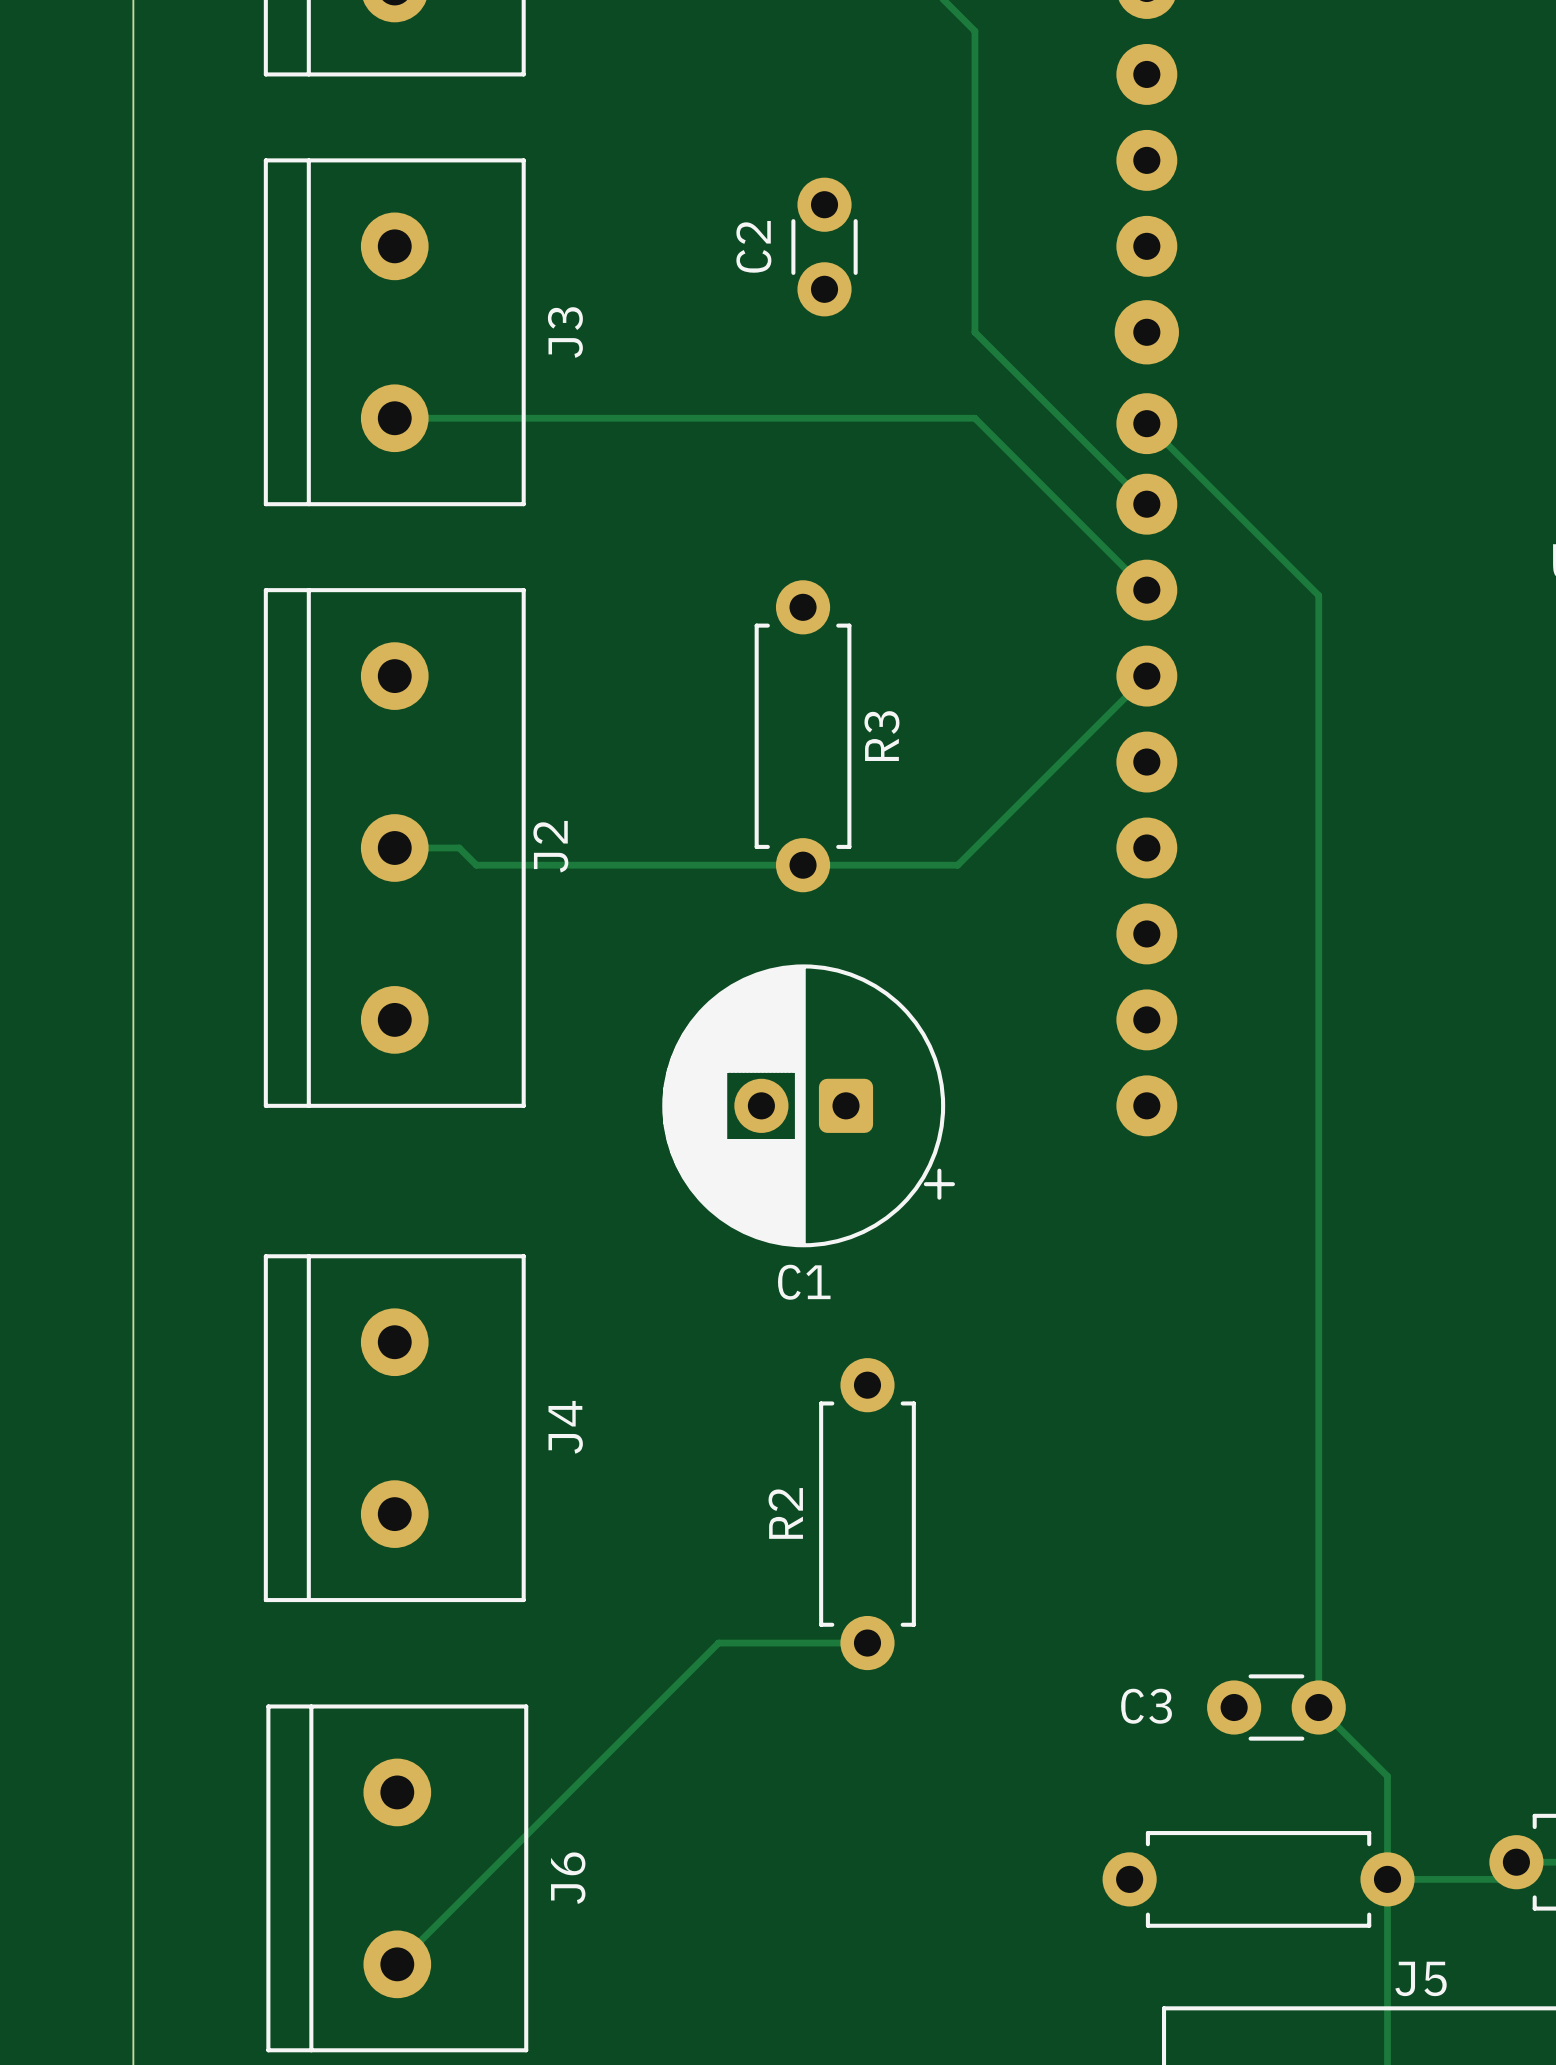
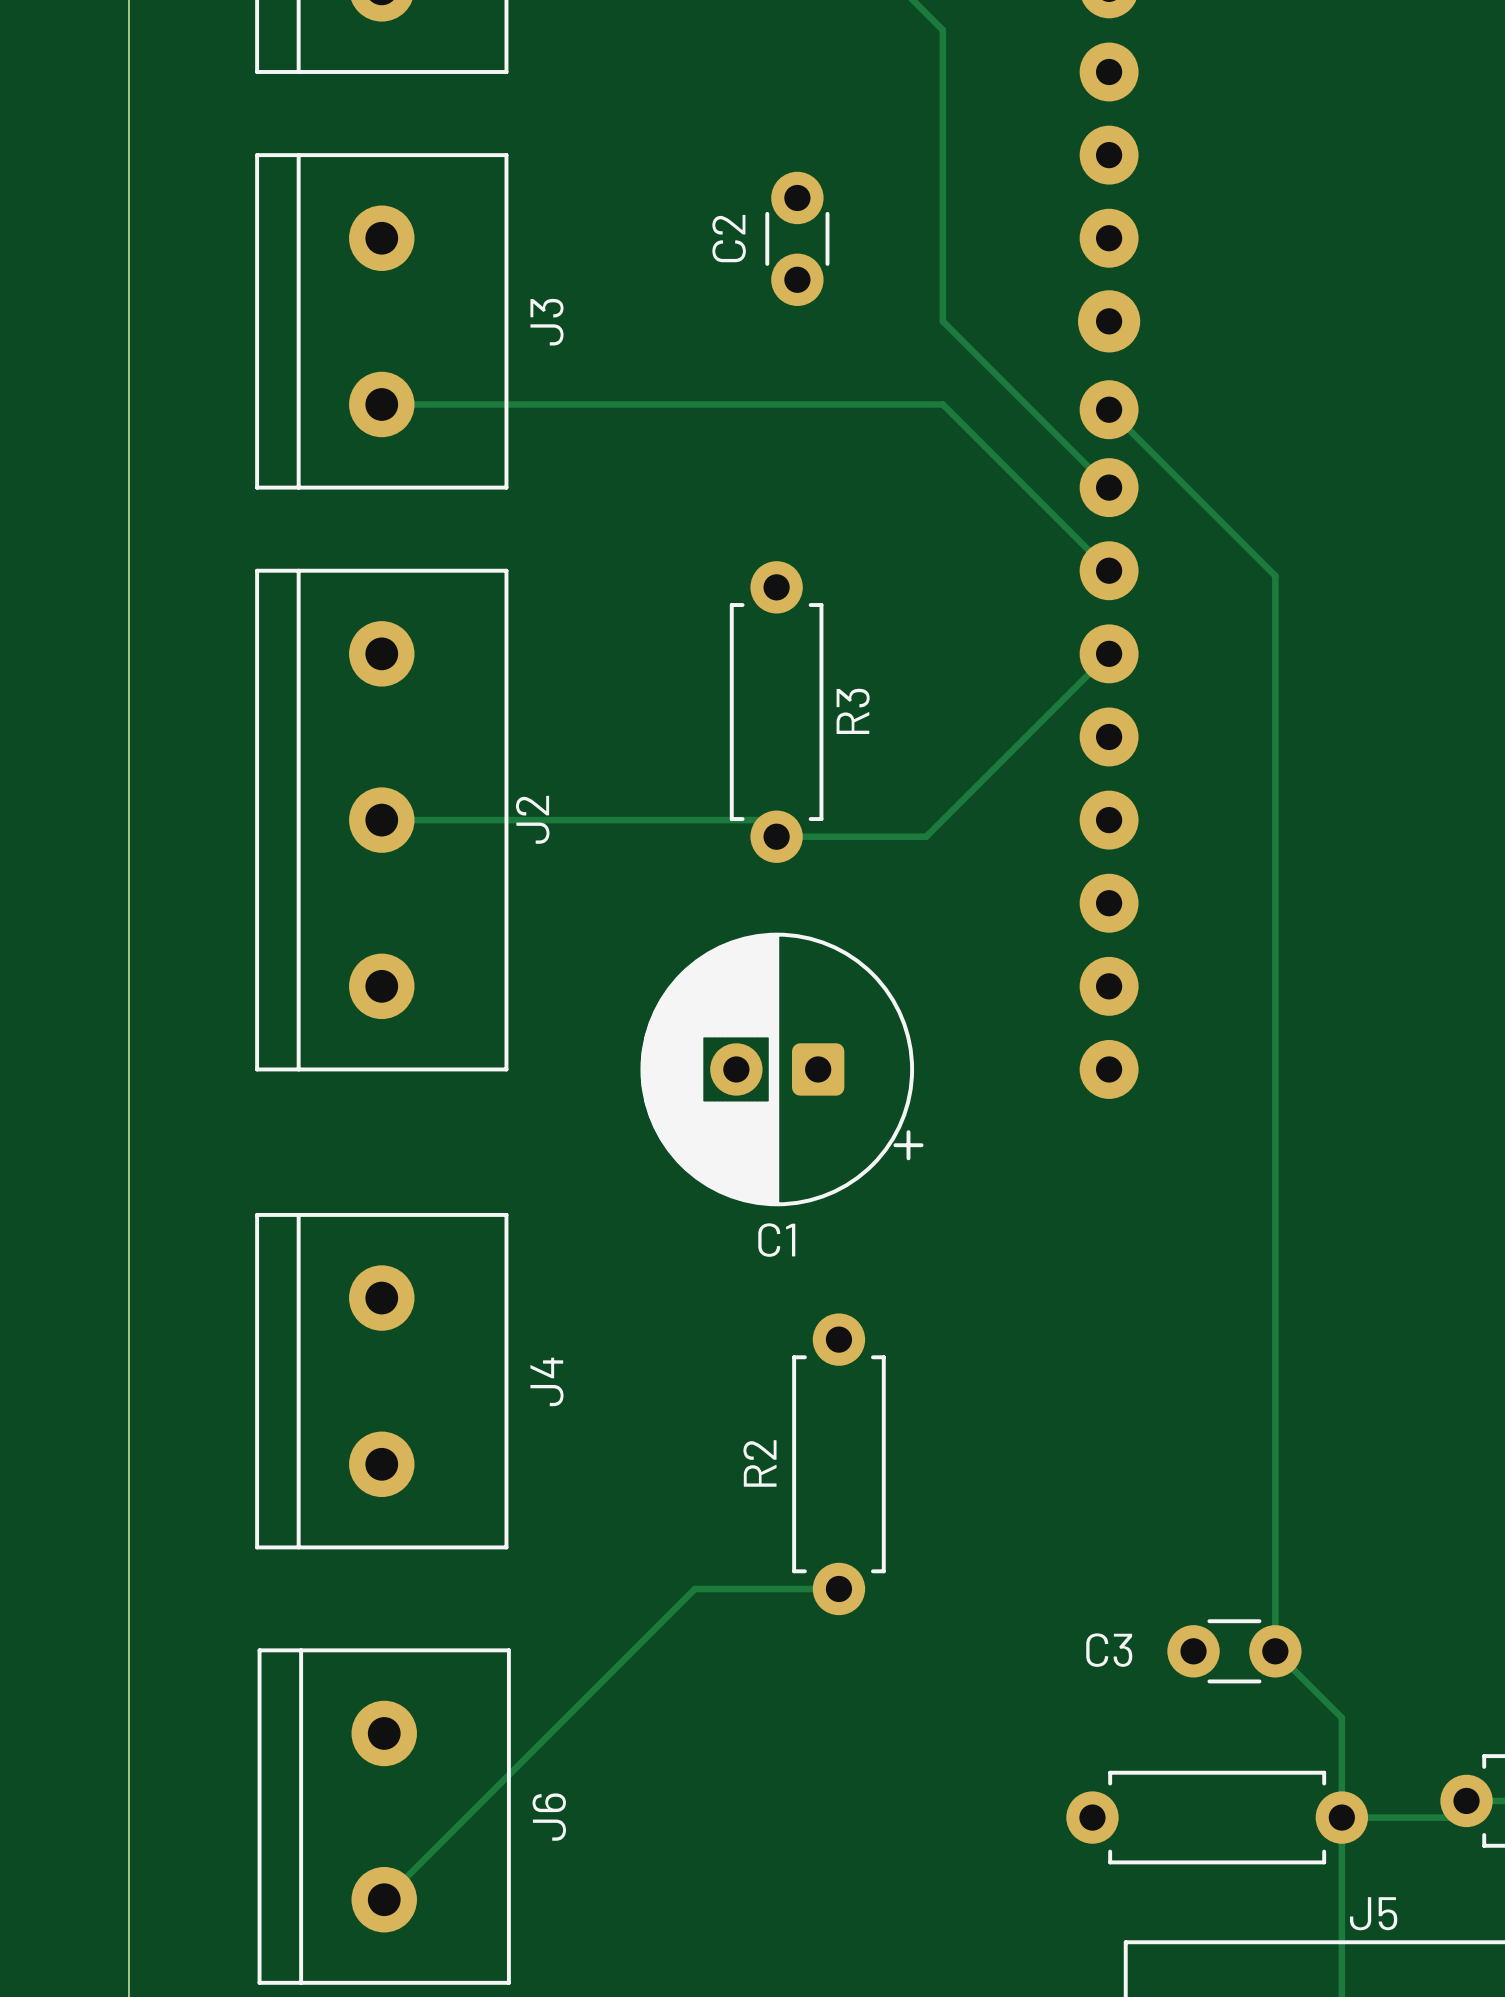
track: (459, 847) (476, 865) (803, 865) -> (444, 820) (759, 820) (776, 836)

